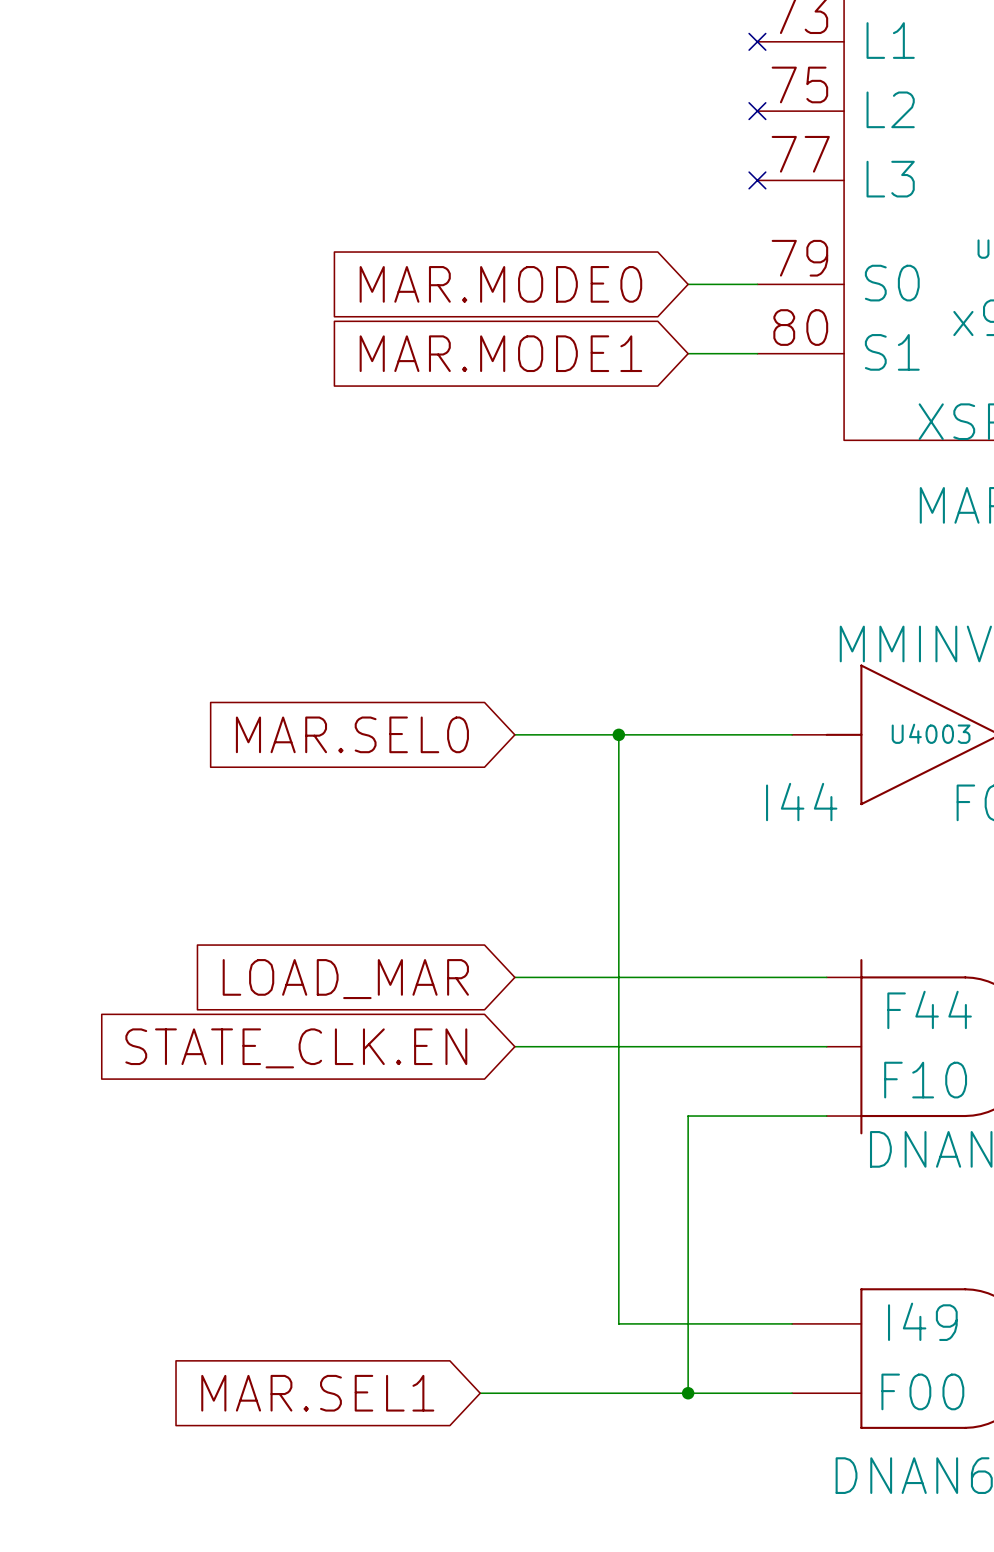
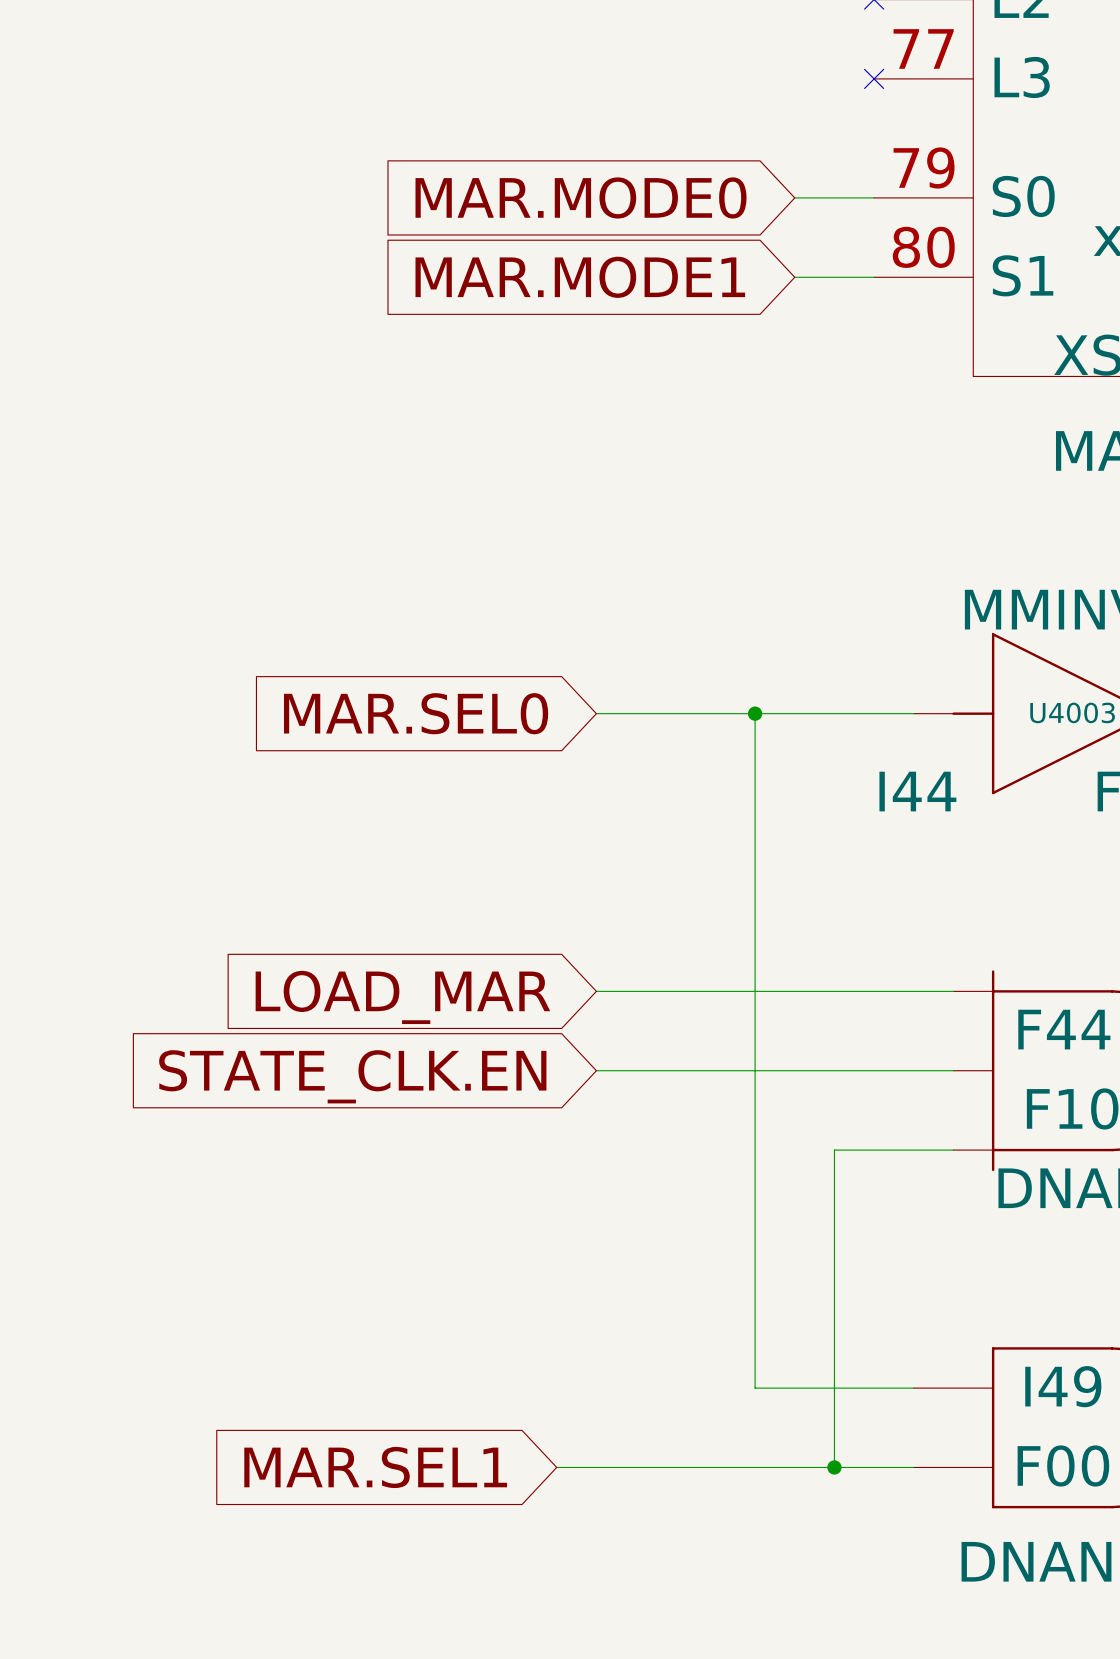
wire: (618, 734) (618, 1323) (653, 1323) -> (755, 713) (755, 1388)
junction position: (618, 734) -> (755, 713)
wire: (722, 1116) (688, 1116) (688, 1393) -> (834, 1150) (834, 1467)
junction position: (688, 1393) -> (834, 1467)

